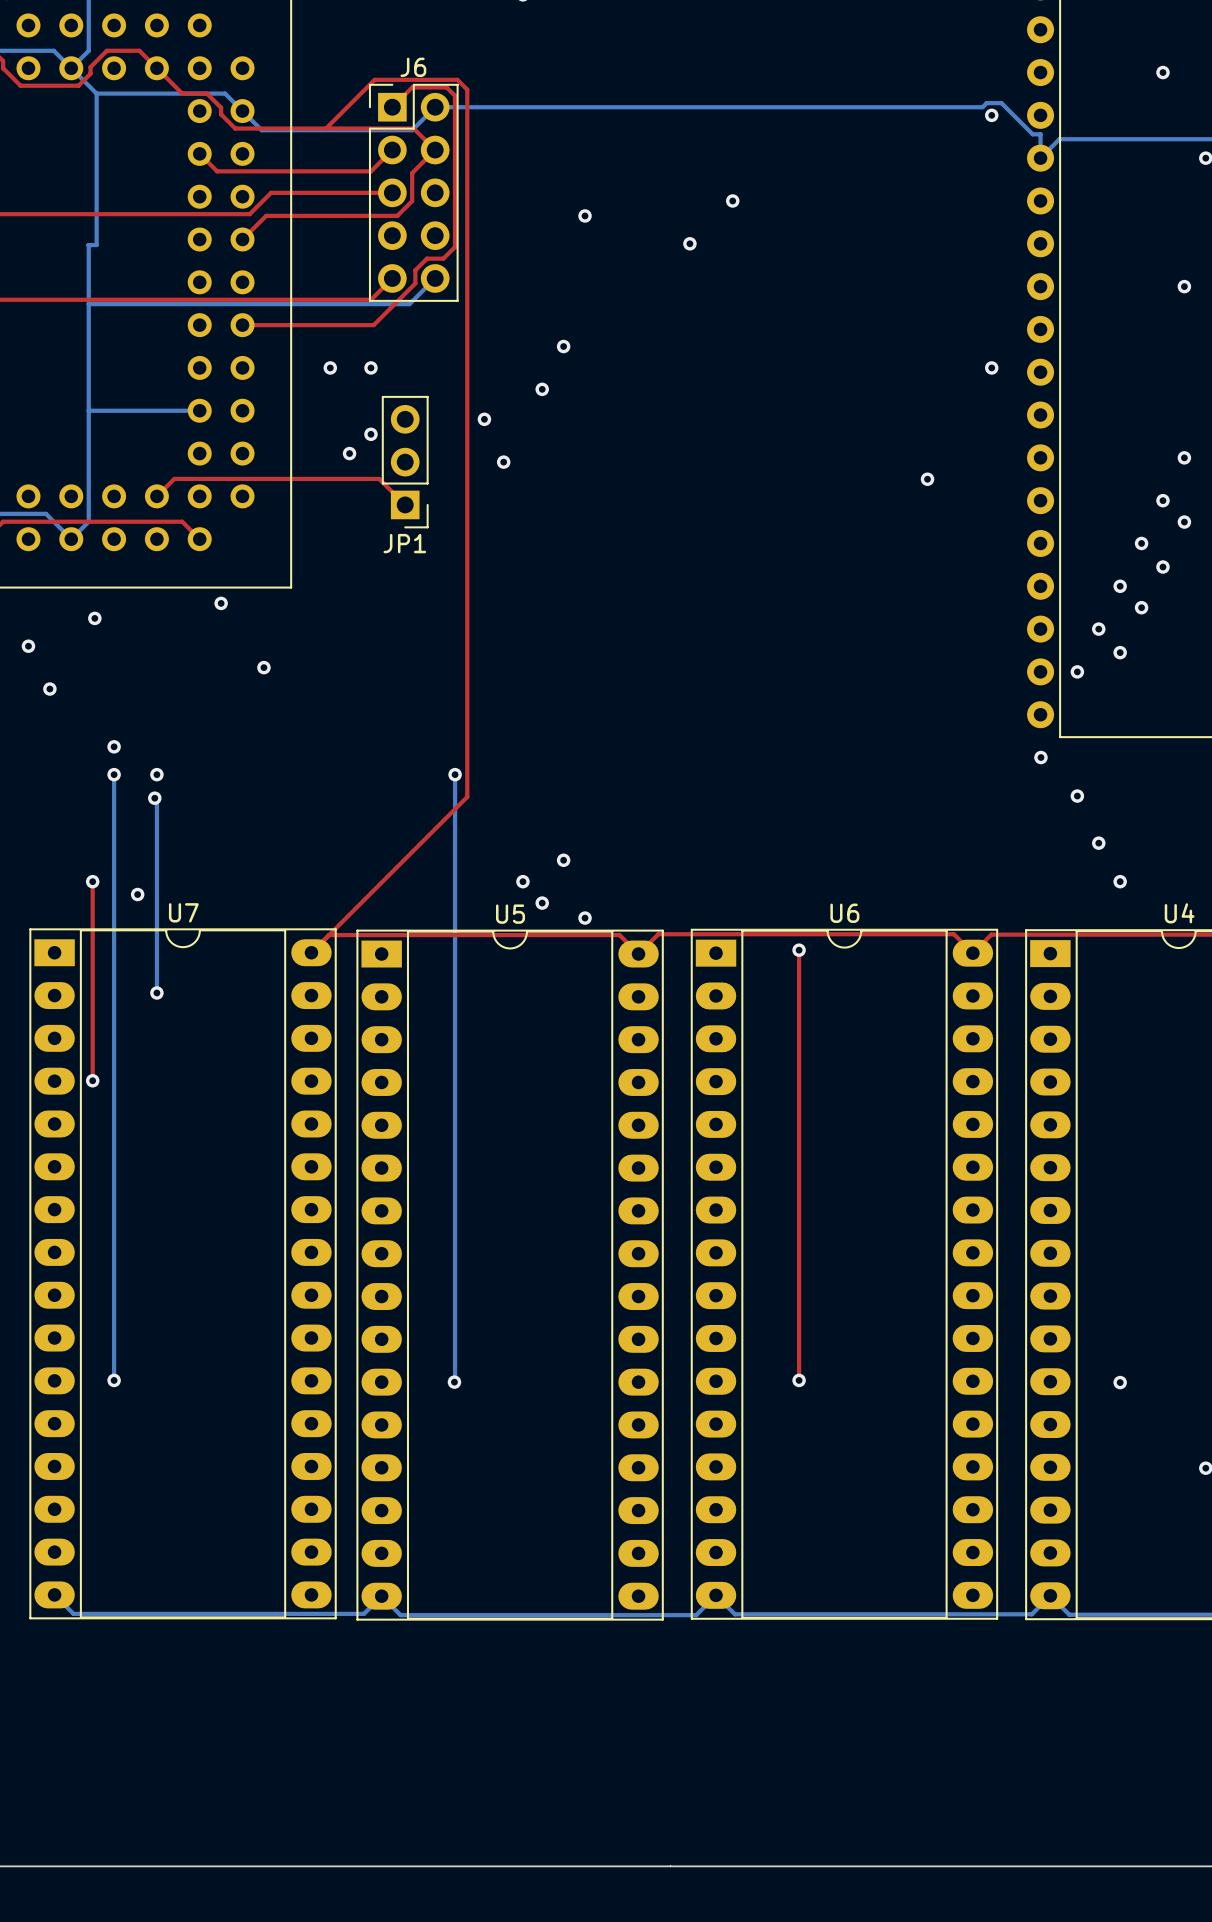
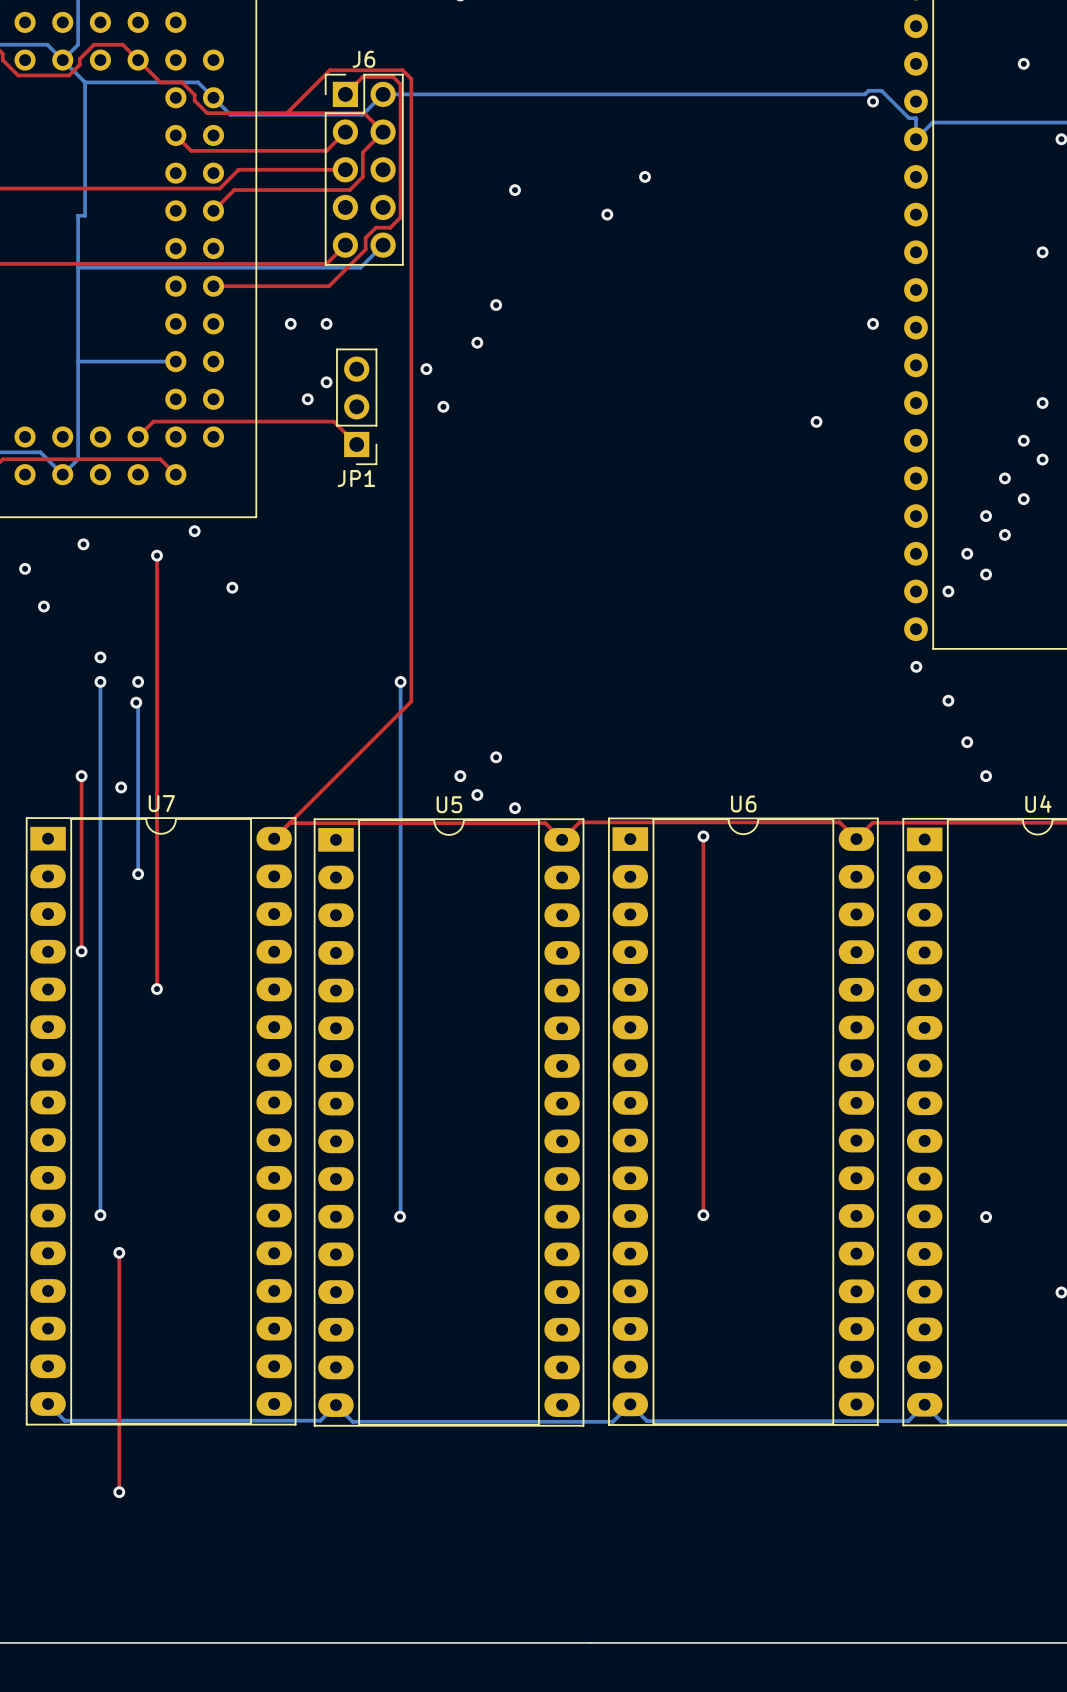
top track: none -> (156, 555) (156, 989)
via: none -> (156, 555)
via: none -> (156, 989)
top track: none -> (119, 1252) (119, 1492)
via: none -> (119, 1252)
via: none -> (119, 1492)

